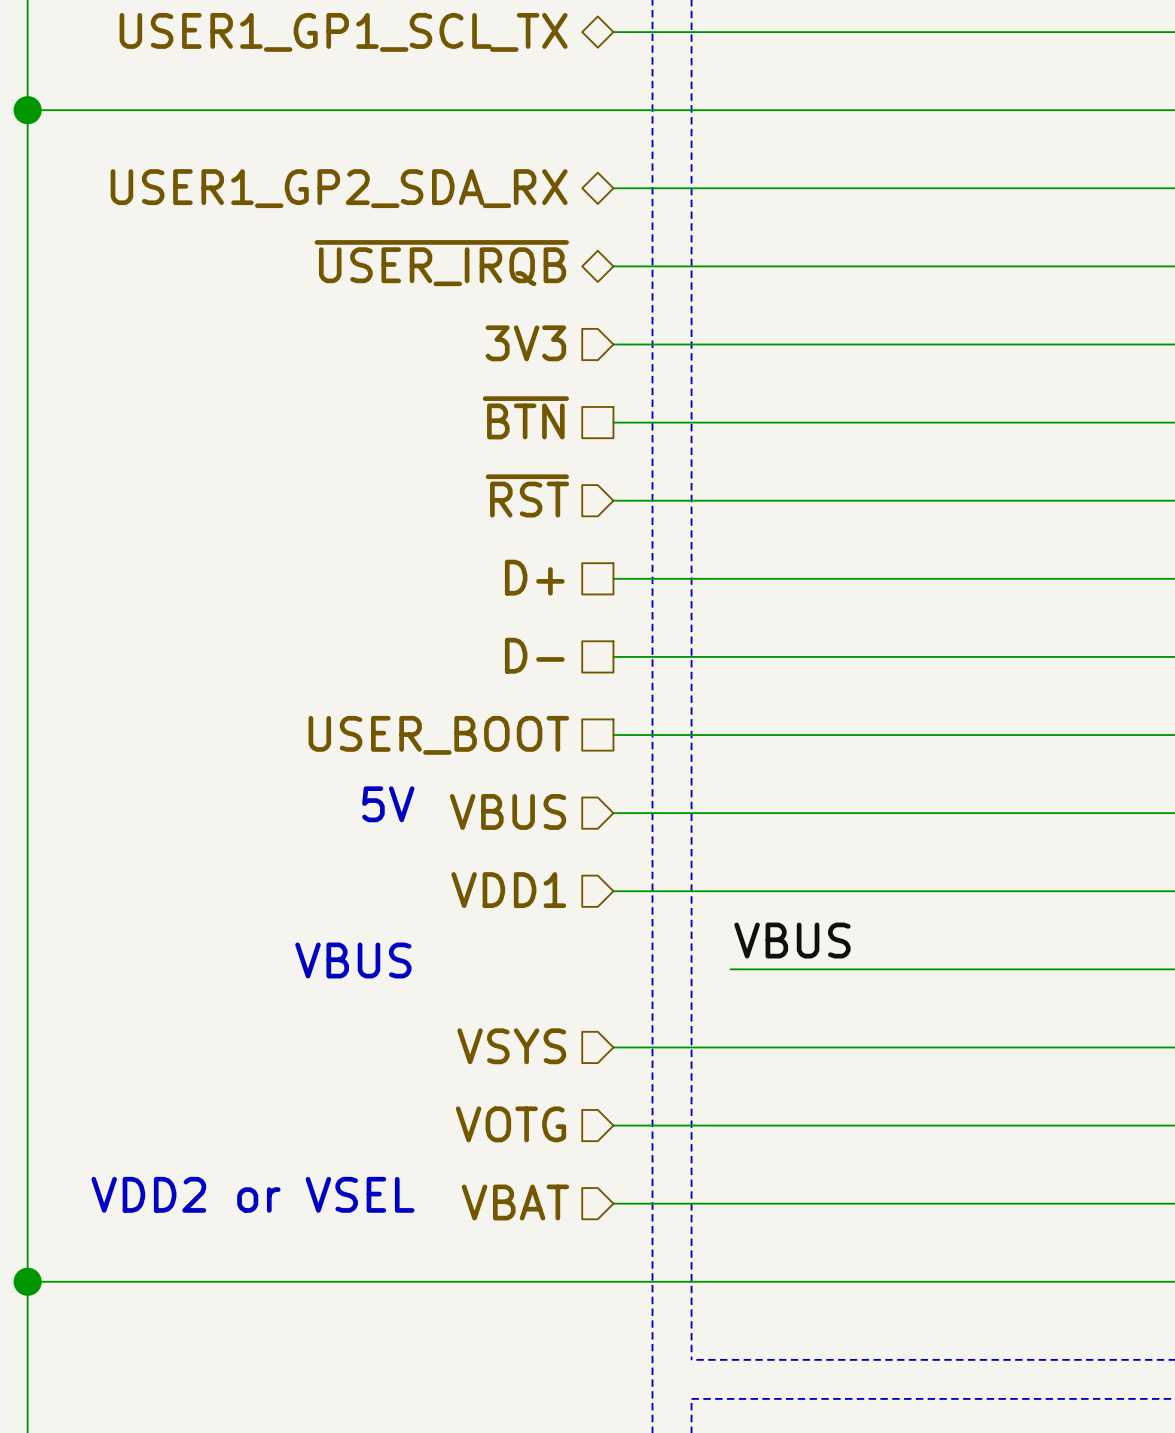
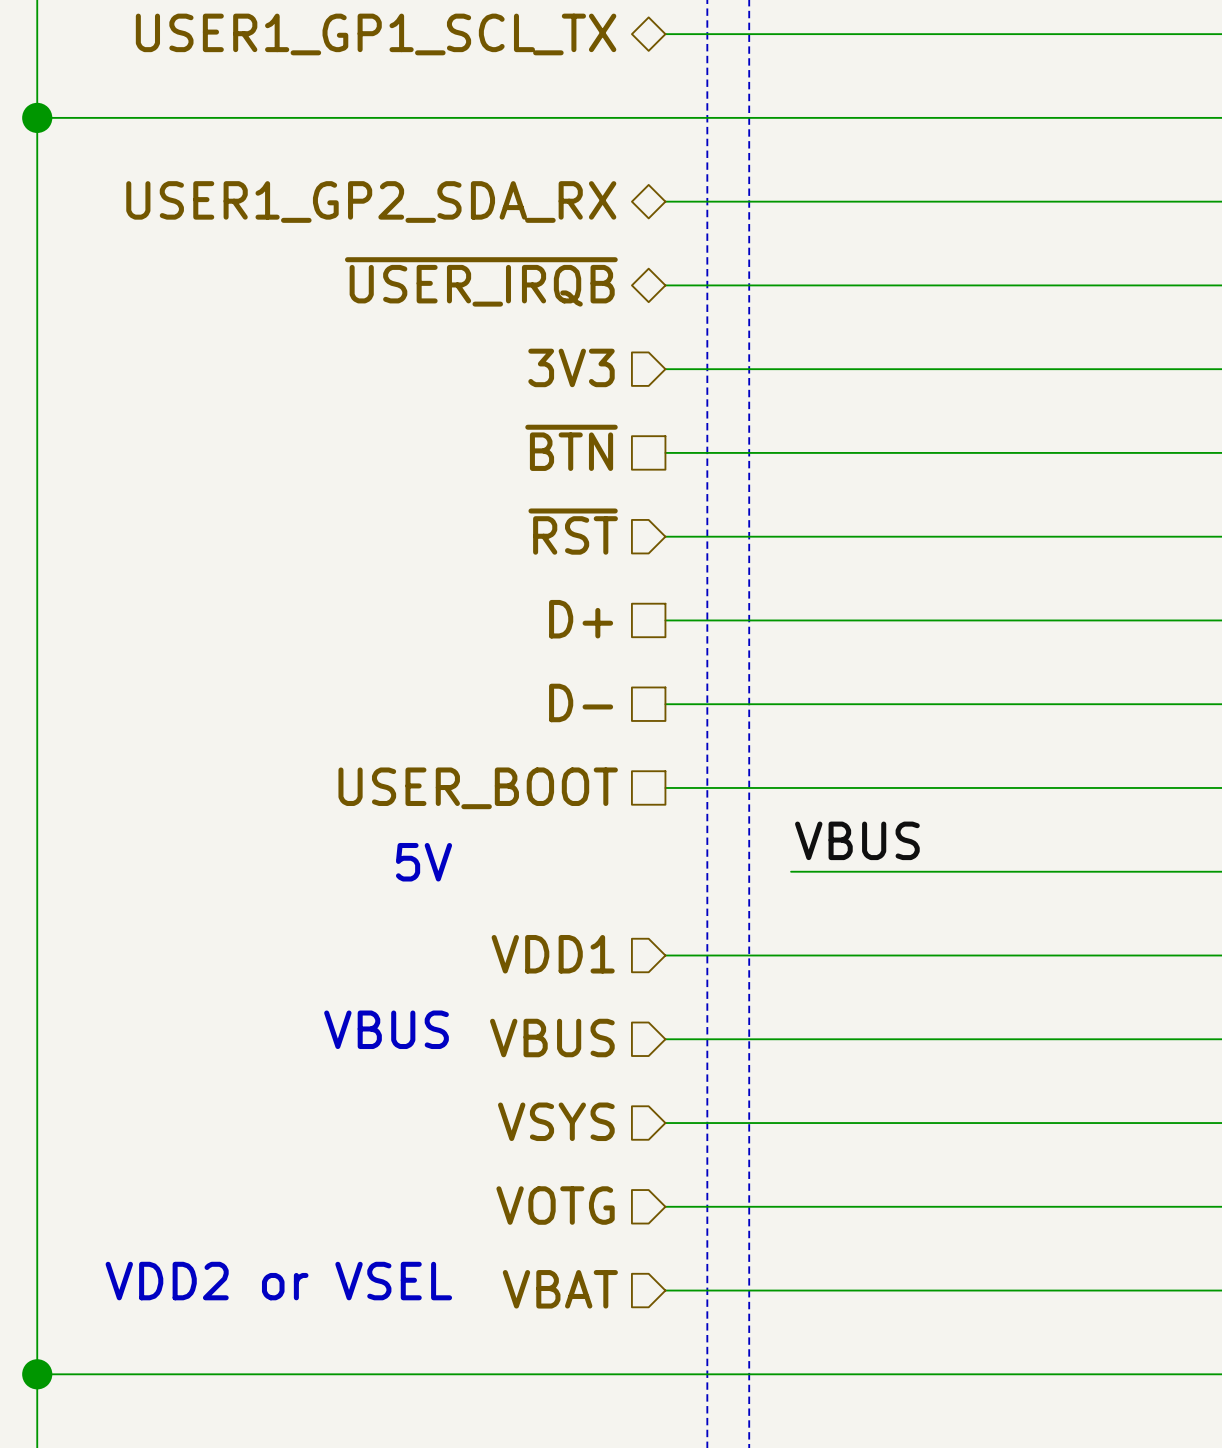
hierarchical label position: VBUS (508, 811) -> VBUS (552, 1038)
wire: (613, 813) (730, 813) -> (665, 1039) (791, 1039)
label position: VBUS (792, 940) -> VBUS (857, 840)

